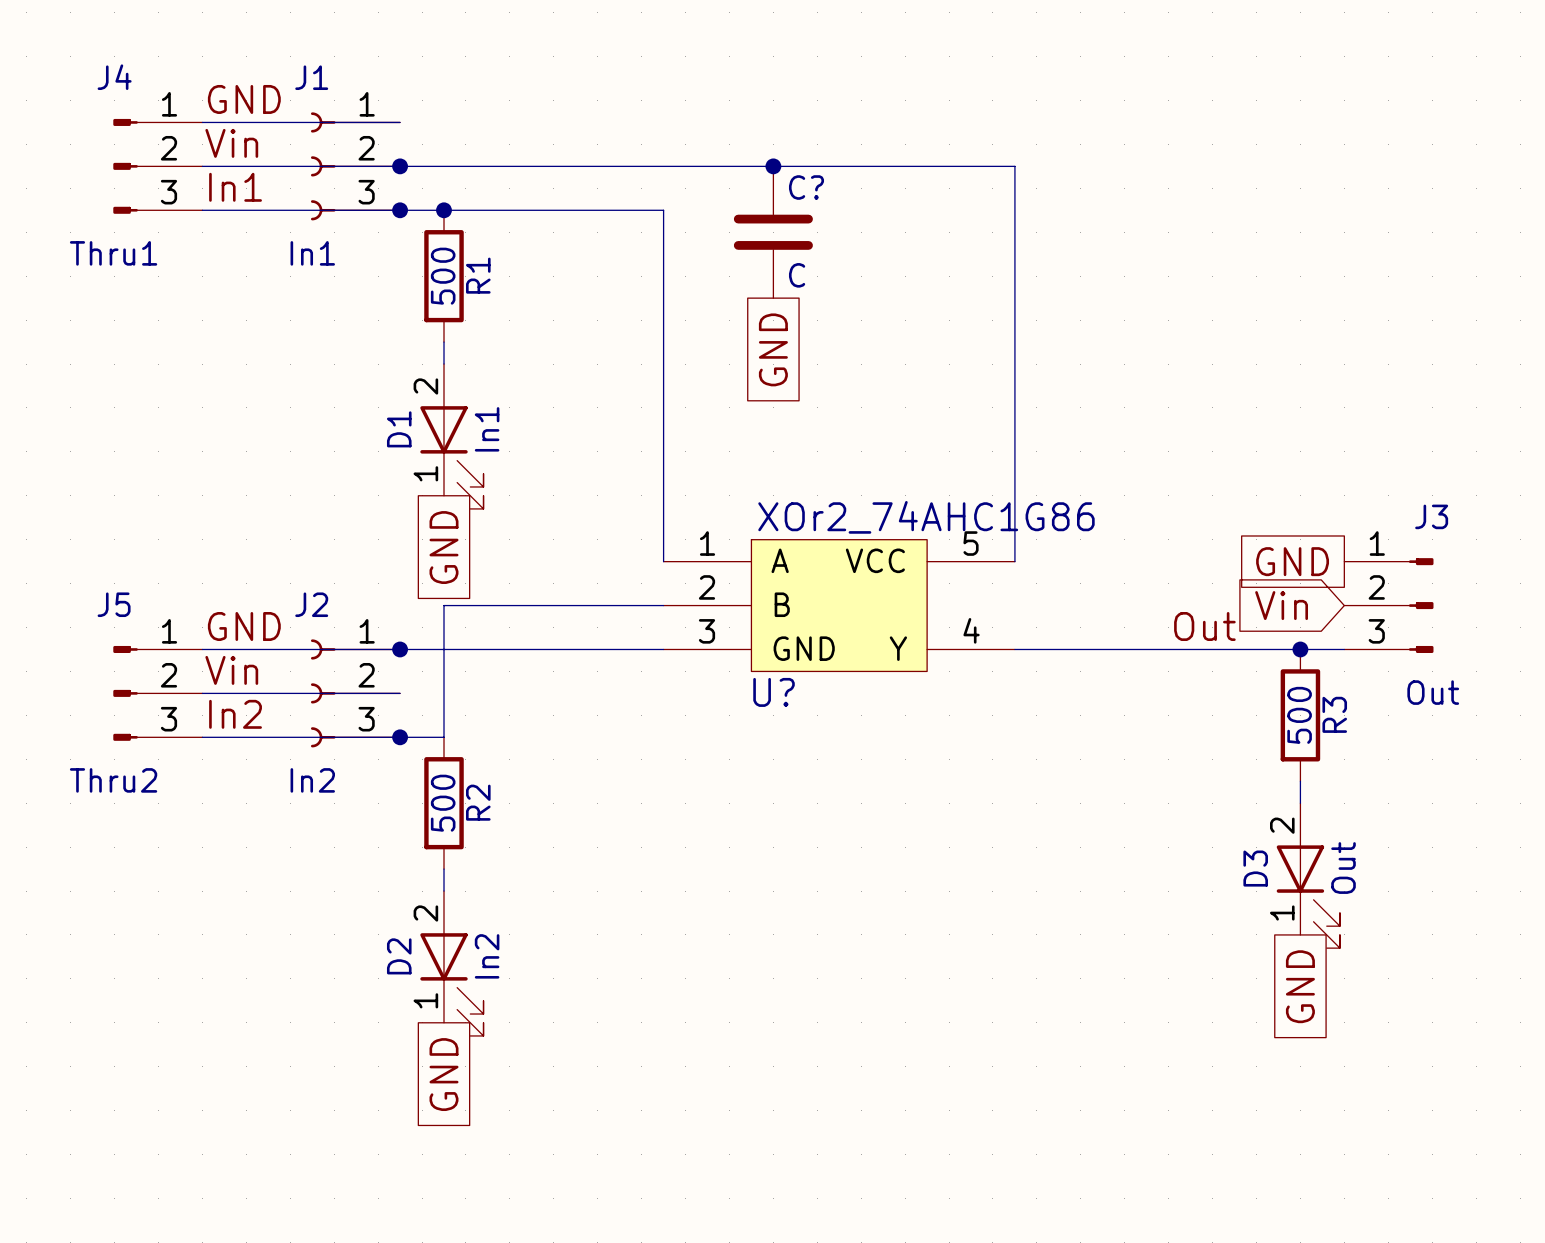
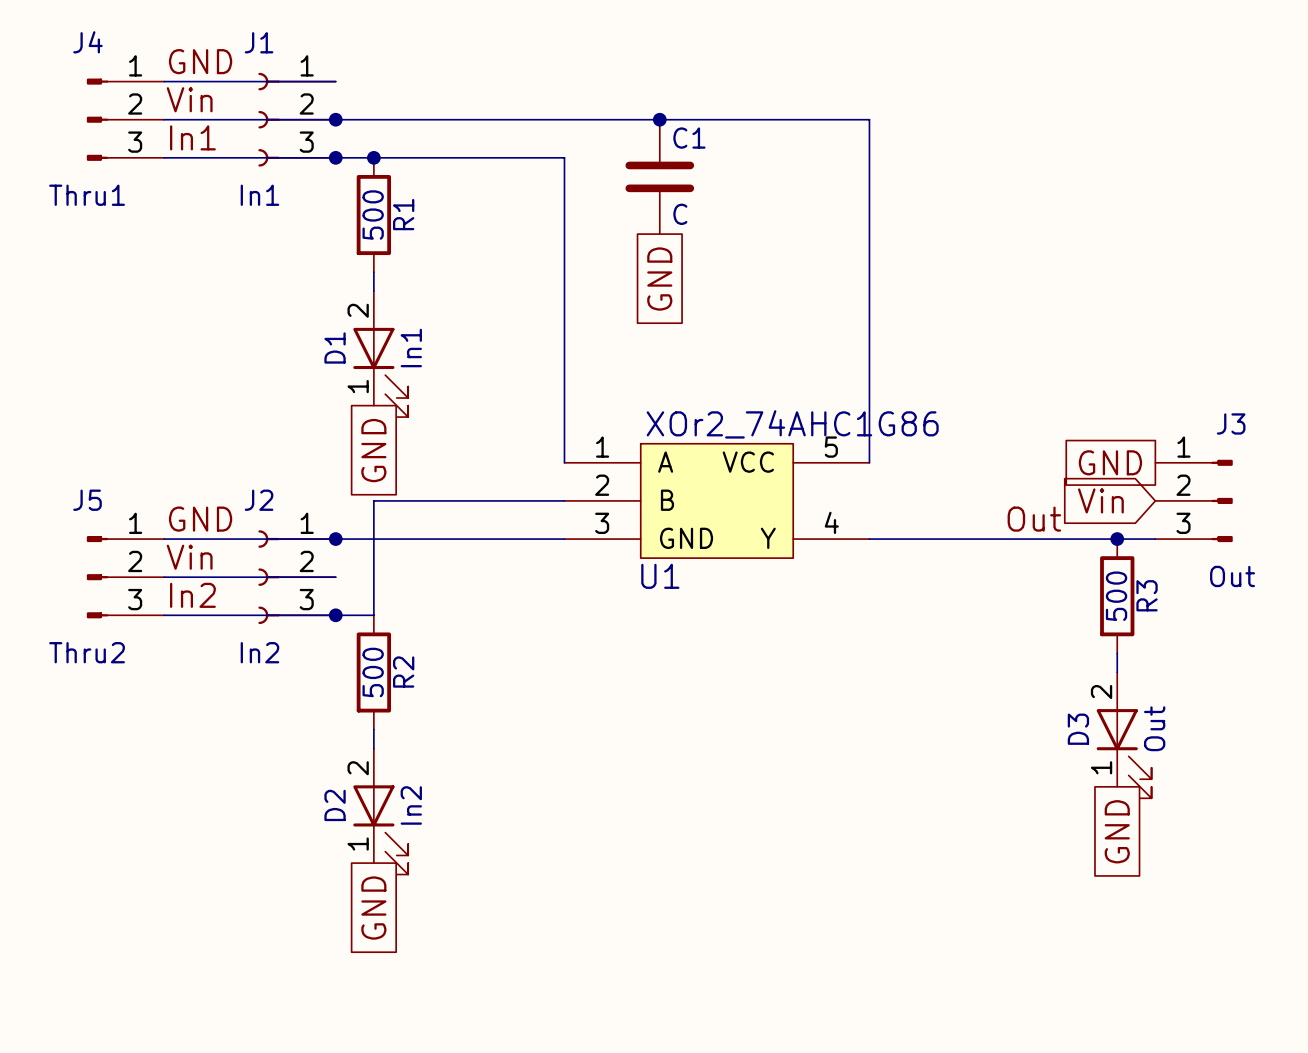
C? name: C? (806, 187) -> C1 (689, 138)
U? name: U? (774, 692) -> U1 (660, 576)

